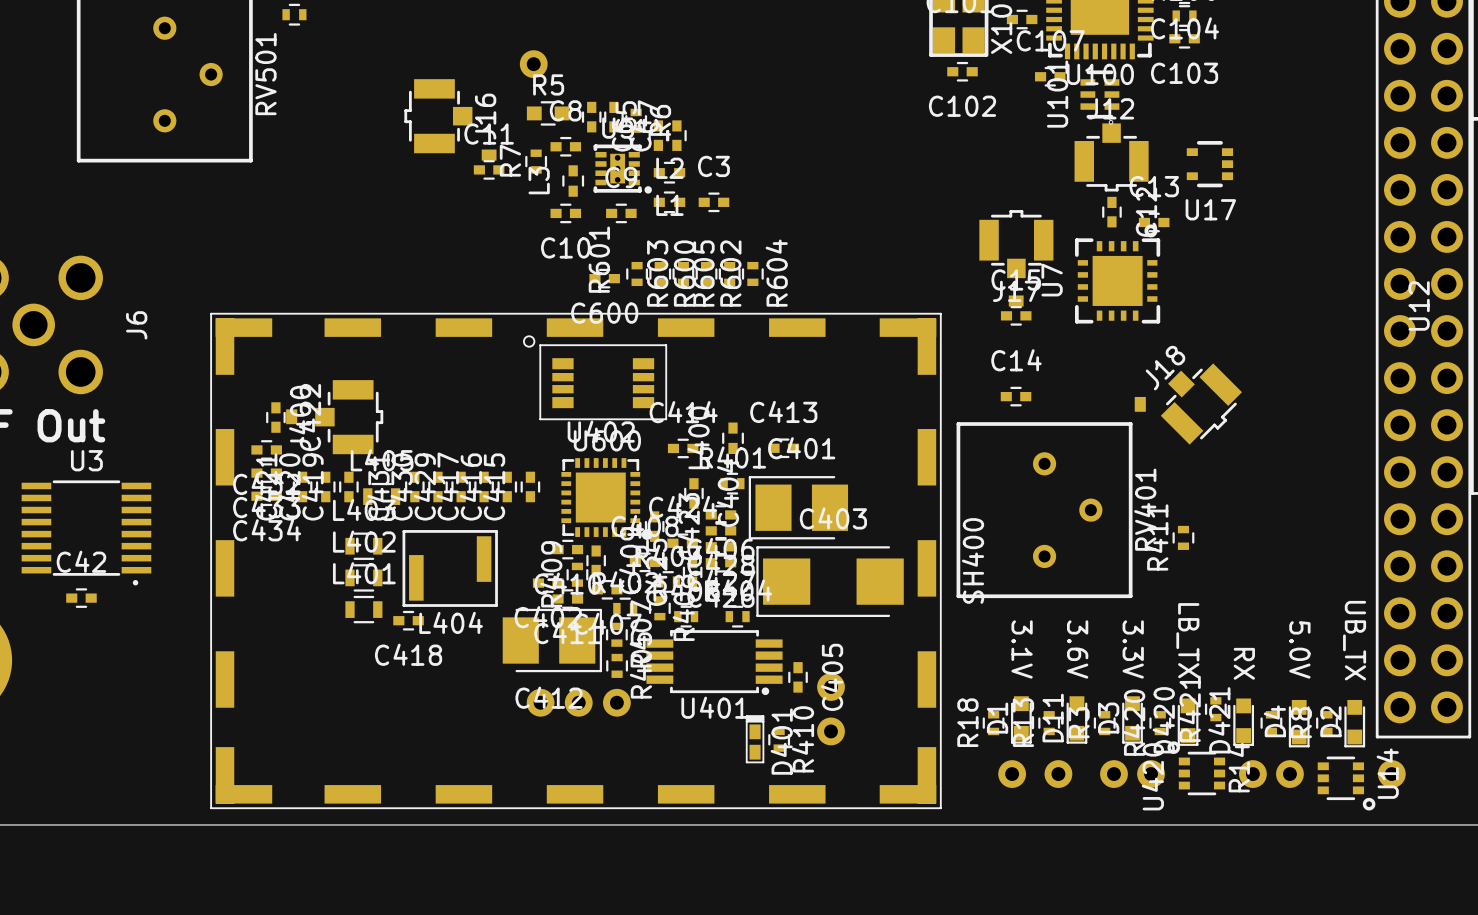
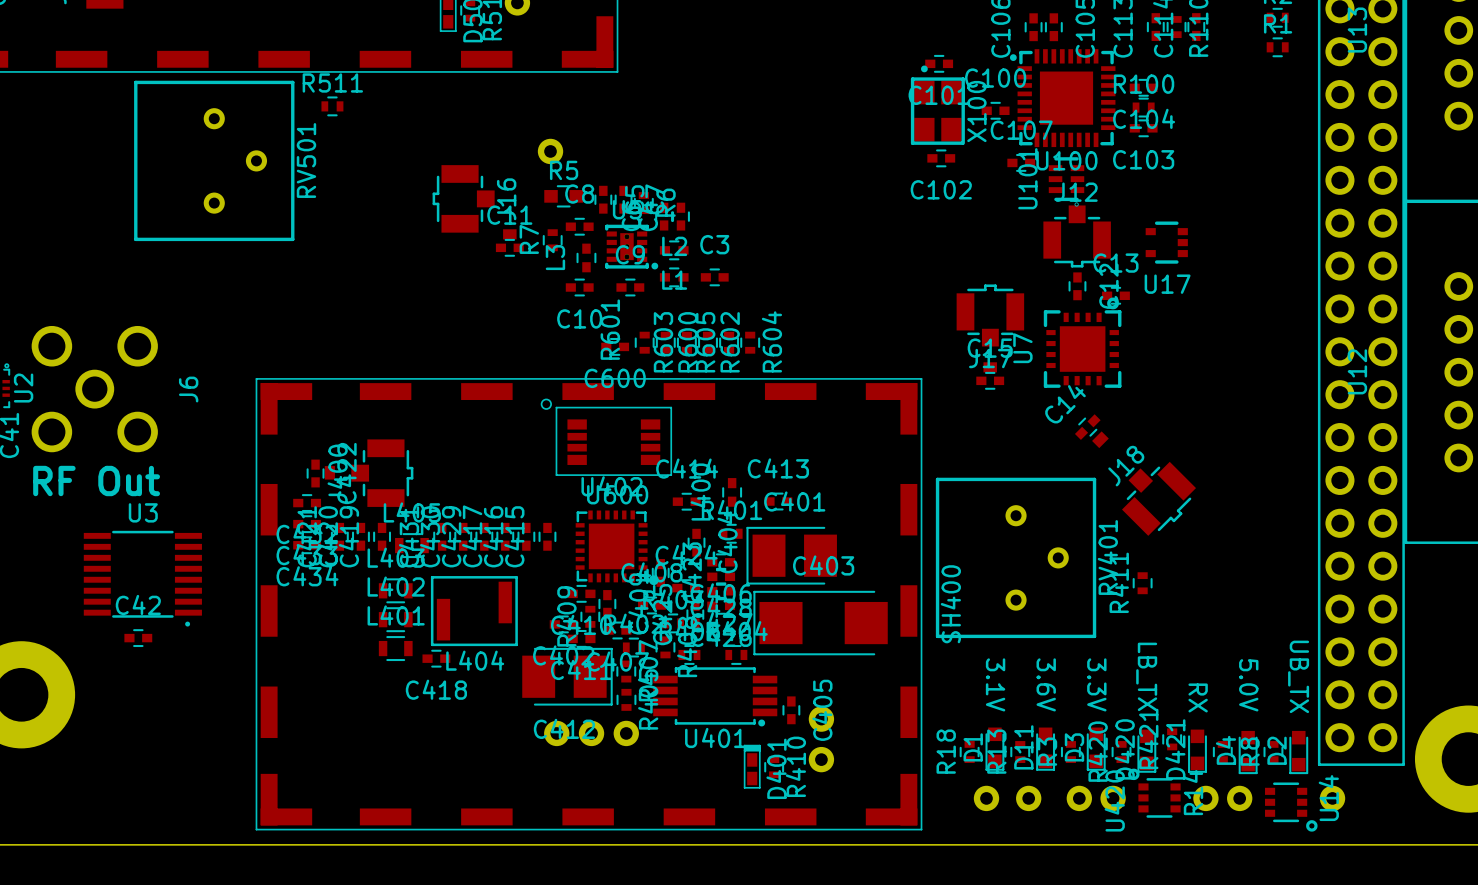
part: none -> (1100, 439)
C14 rotation: 0° (1016, 396) -> 45° counterclockwise (1087, 427)
C14 position: (1016, 396) -> (1087, 427)
part: (1140, 404) -> none
J18 position: (1201, 404) -> (1159, 498)

